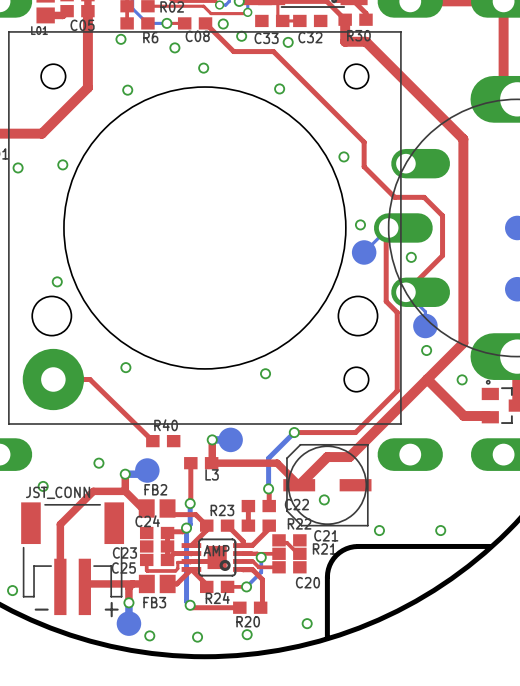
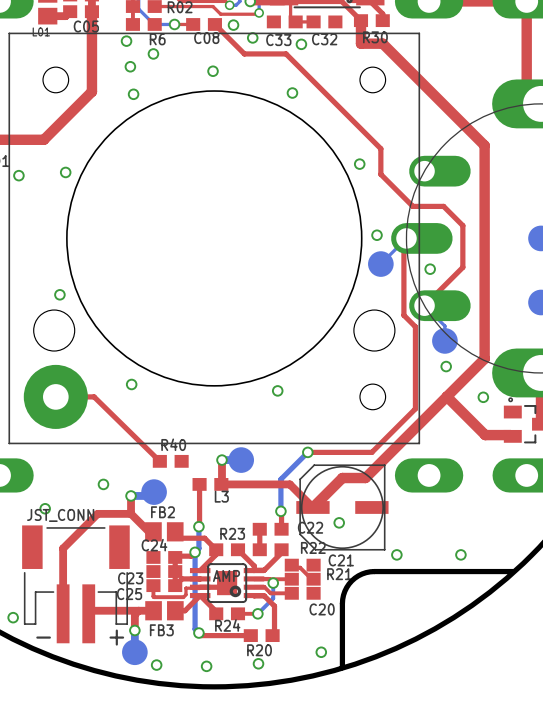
via: (174, 47) -> none
via: none -> (153, 53)
via: none -> (130, 66)

